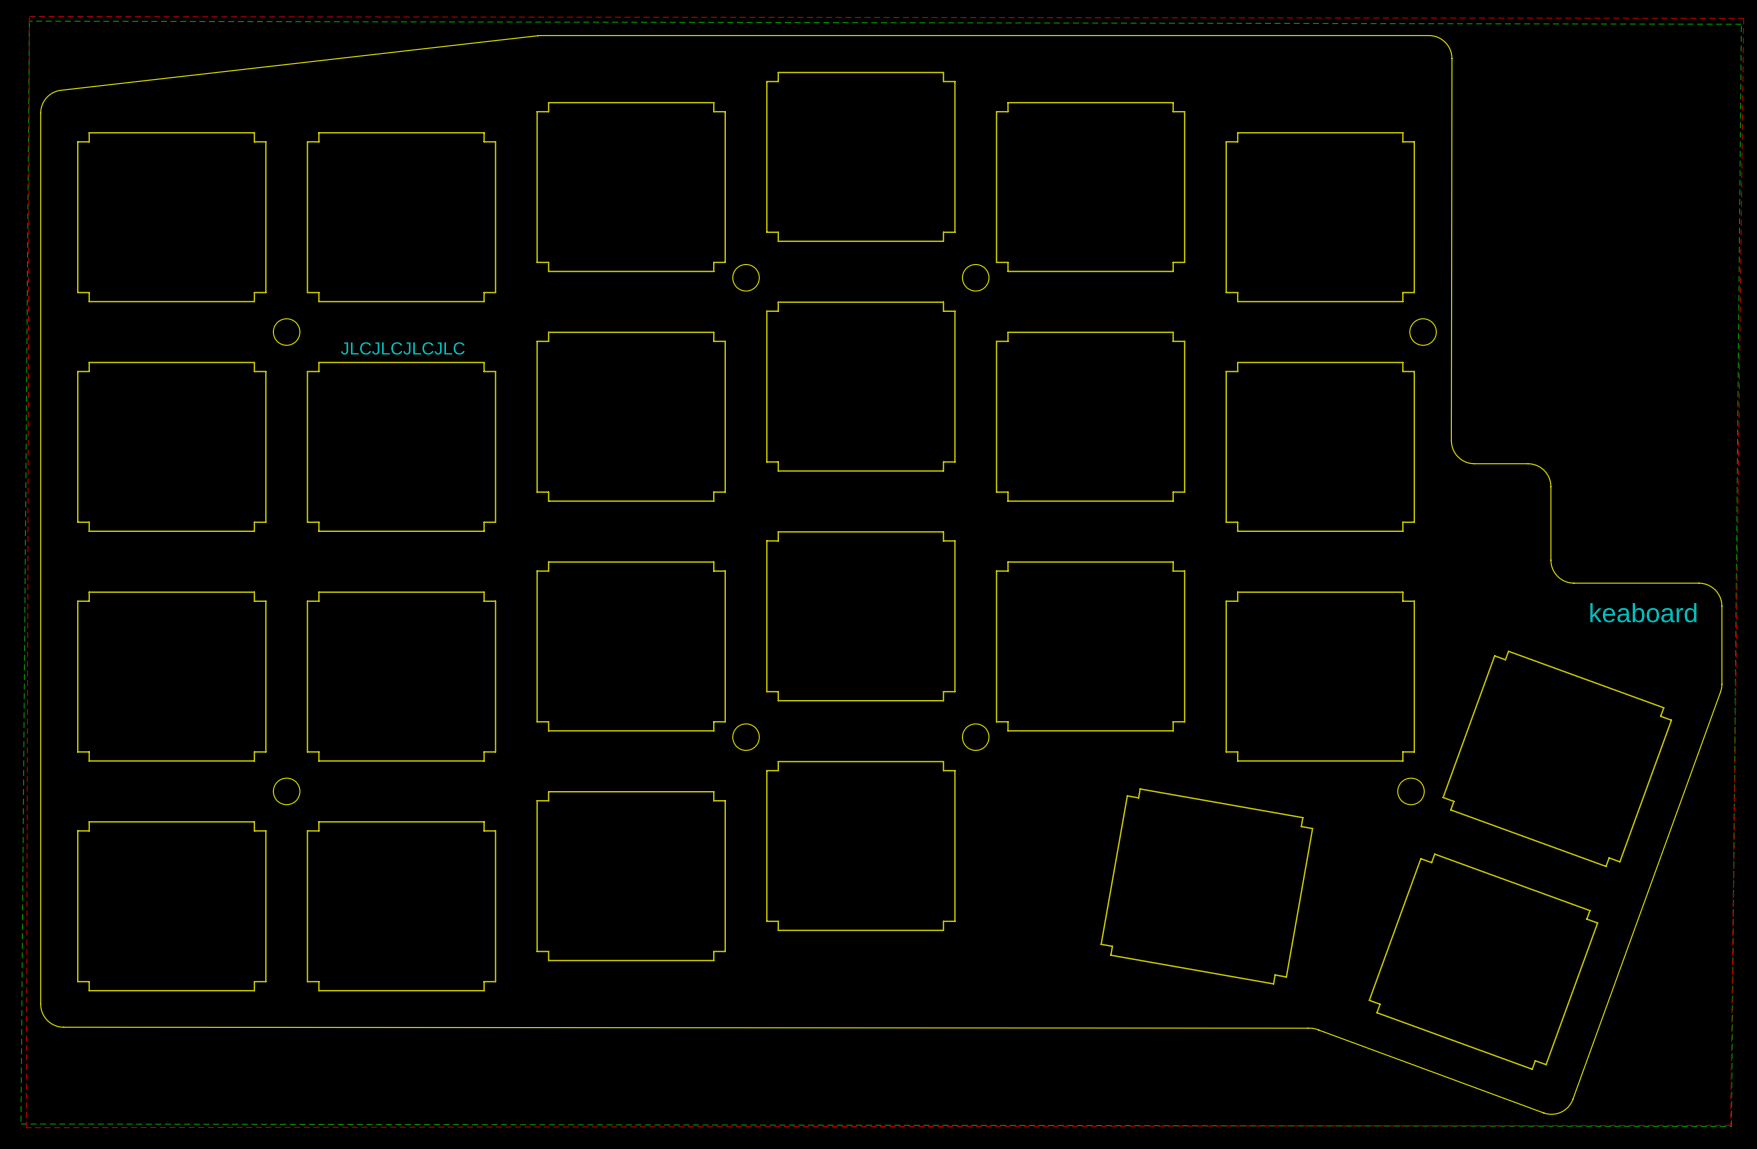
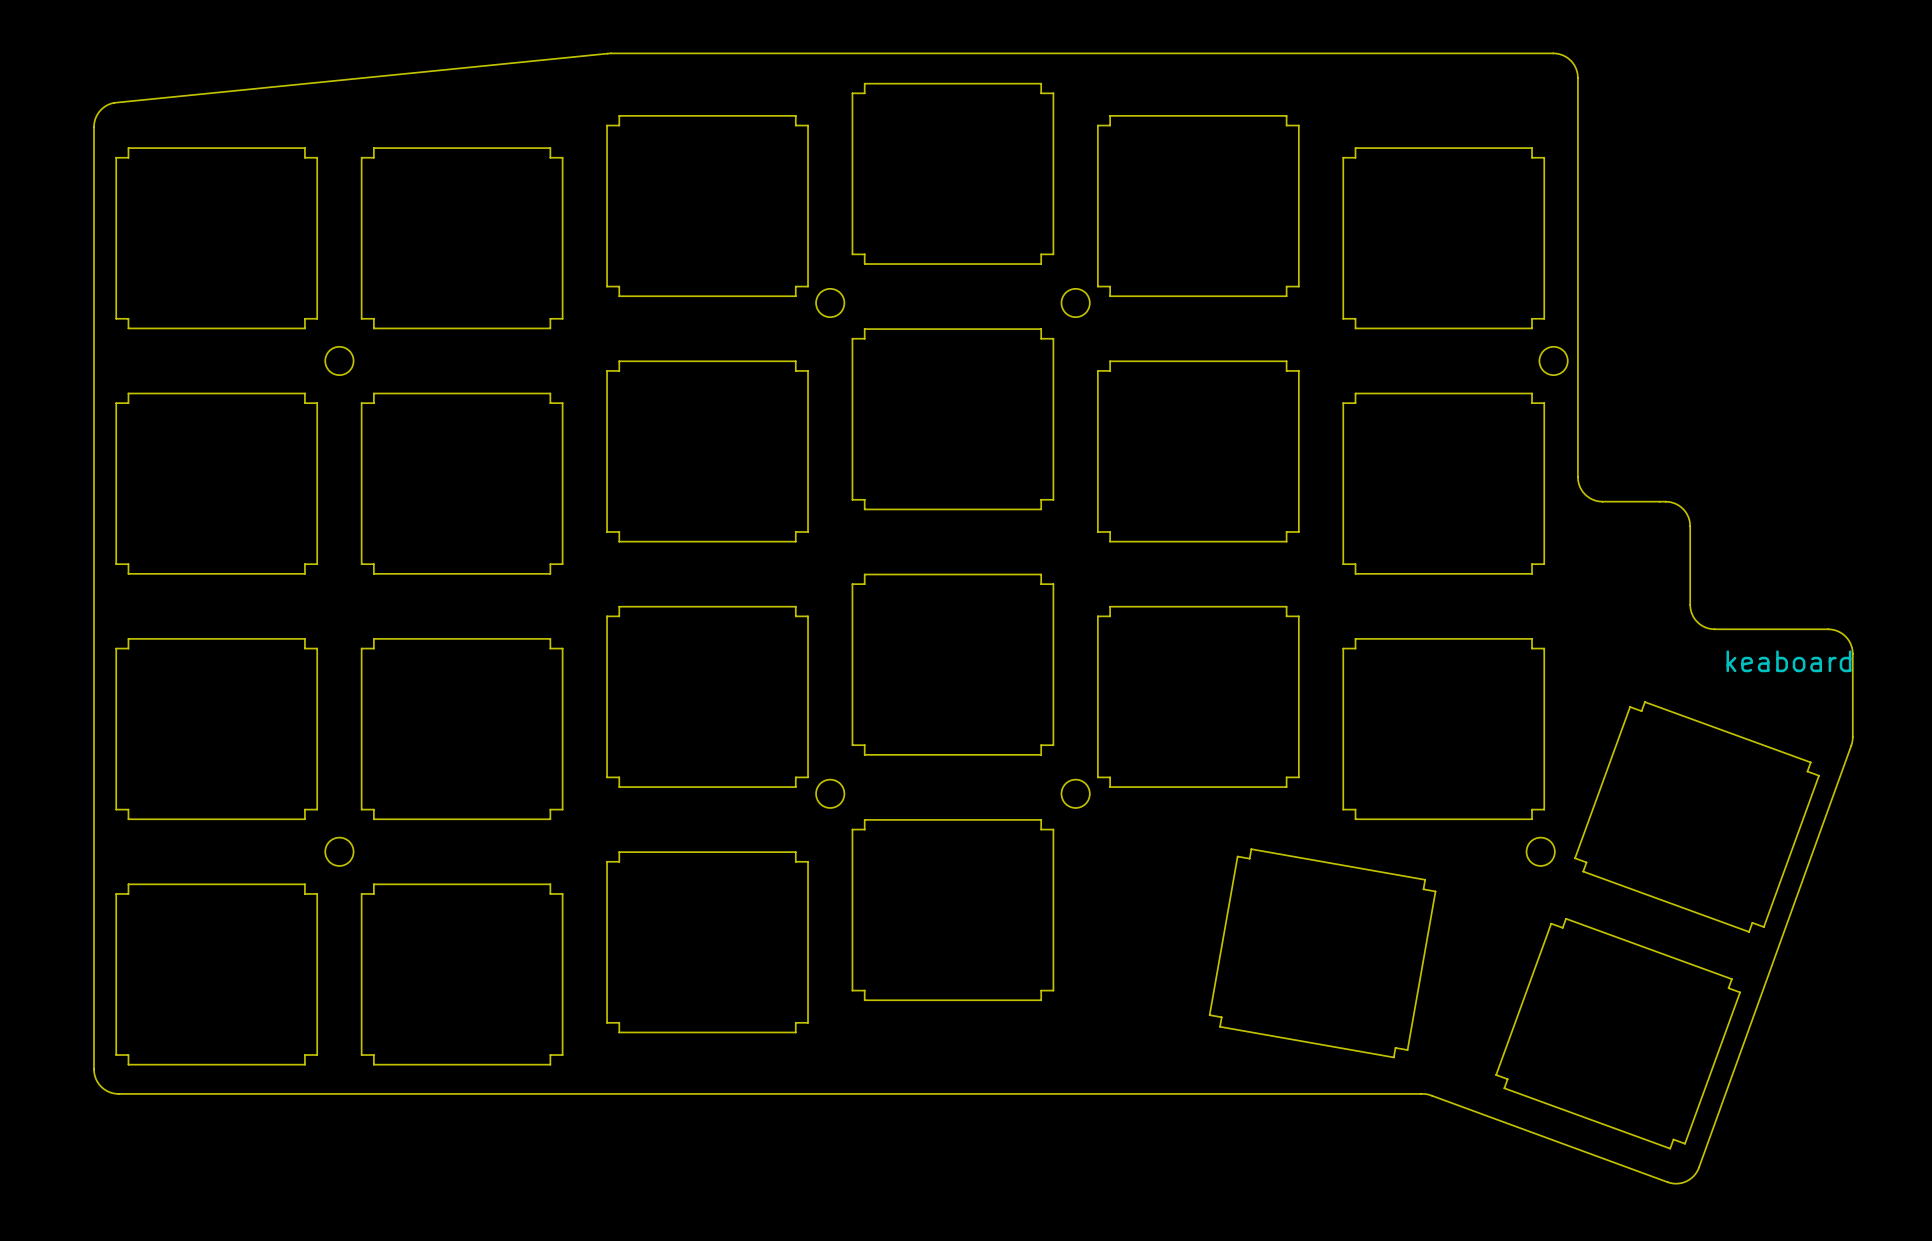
top zone outline: (29, 16) (26, 1127) (1730, 1125) (1743, 18) (29, 16) -> none
bottom zone outline: (29, 21) (1741, 24) (1731, 1126) (20, 1123) (29, 21) -> none
text: JLCJLCJLCJLC (402, 348) -> none
board edge: (1474, 463) (1460, 458) (1454, 452) (1451, 443) (1451, 58) (1447, 44) (1434, 36) (539, 35) (54, 91) (44, 100) (40, 113) (40, 1004) (42, 1013) (52, 1024) (63, 1027) (1310, 1028) (1543, 1112) (1558, 1113) (1566, 1108) (1572, 1099) (1721, 690) (1721, 606) (1720, 597) (1715, 589) (1707, 584) (1680, 583) -> (1608, 501) (1596, 500) (1587, 496) (1581, 489) (1578, 480) (1577, 77) (1572, 62) (1559, 54) (609, 53) (108, 104) (98, 113) (94, 127) (94, 1069) (95, 1078) (106, 1090) (118, 1093) (1423, 1093) (1667, 1182) (1683, 1182) (1691, 1177) (1698, 1167) (1851, 743) (1851, 647) (1843, 634) (1828, 629)

